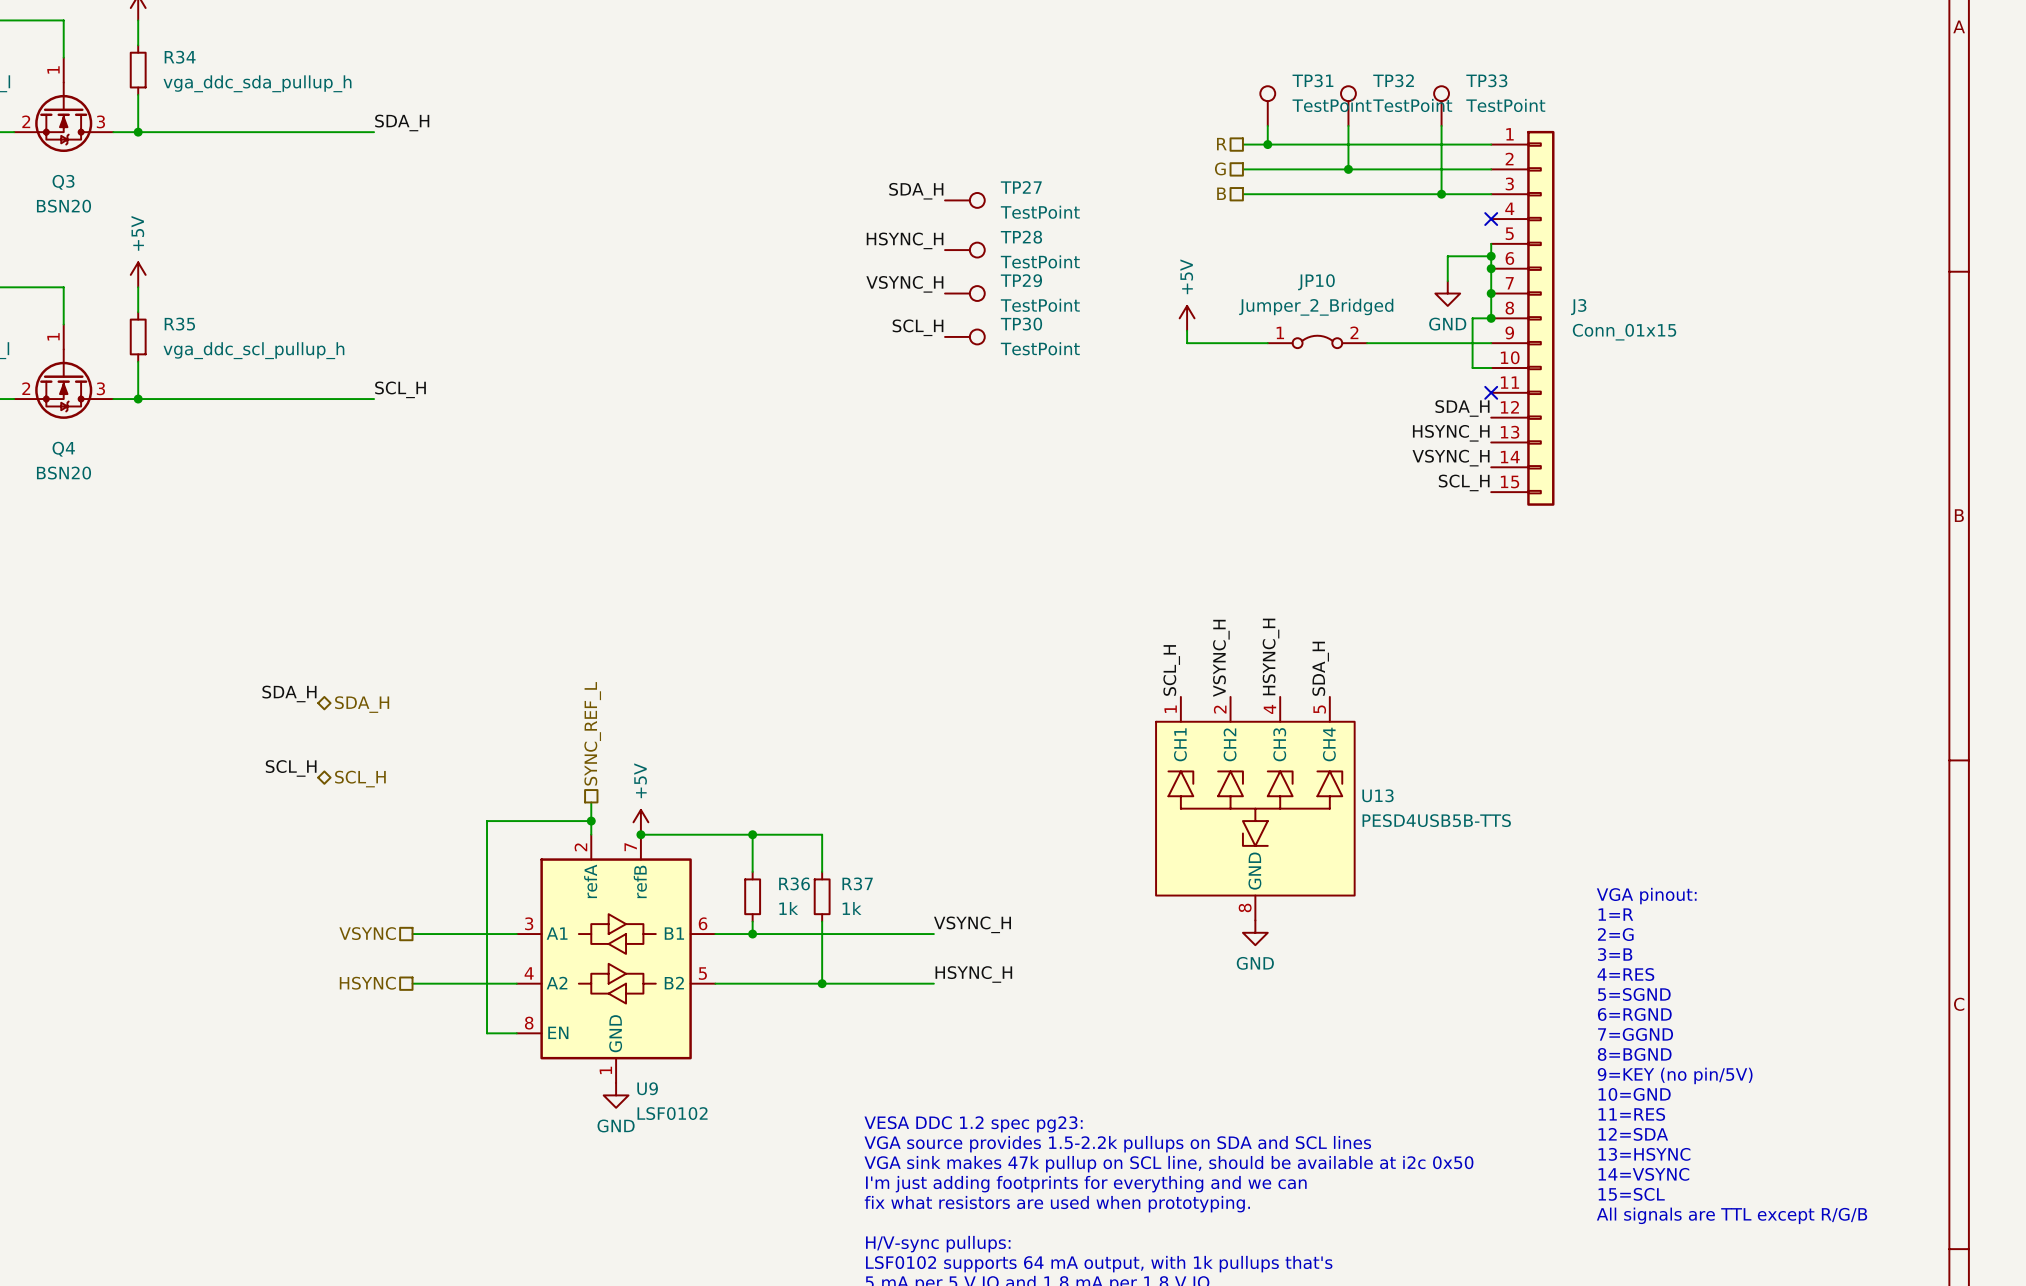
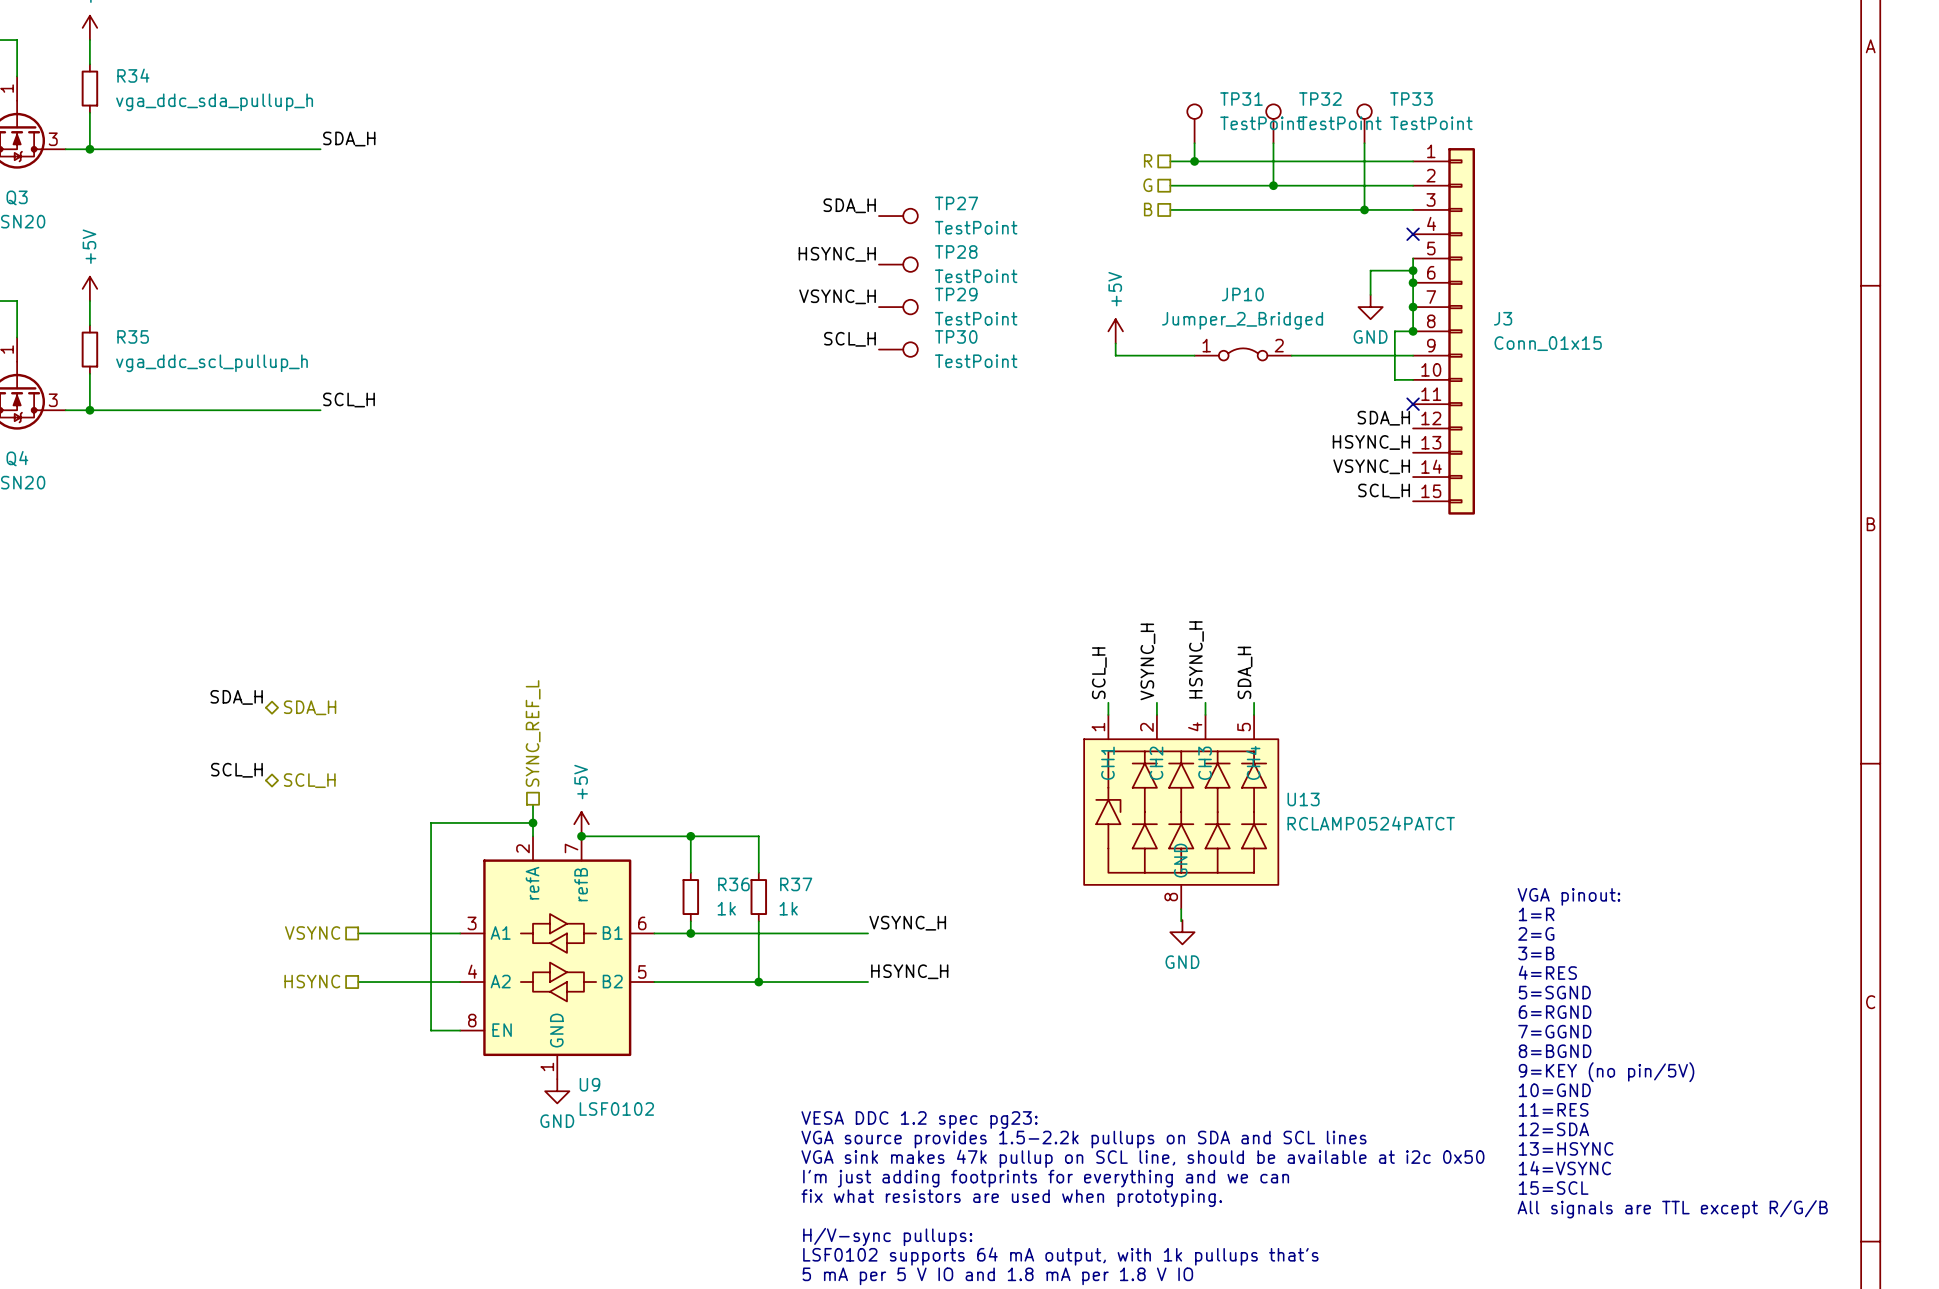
U13 symbol: [1156, 696, 1355, 921] -> [1084, 714, 1279, 910]
wire: none -> (1108, 702) (1108, 714)
wire: none -> (1156, 702) (1156, 714)
wire: none -> (1205, 702) (1205, 714)
wire: none -> (1254, 702) (1254, 714)
U13 value: PESD4USB5B-TTS (1436, 820) -> RCLAMP0524PATCT (1371, 823)
wire: none -> (1181, 909) (1181, 921)

